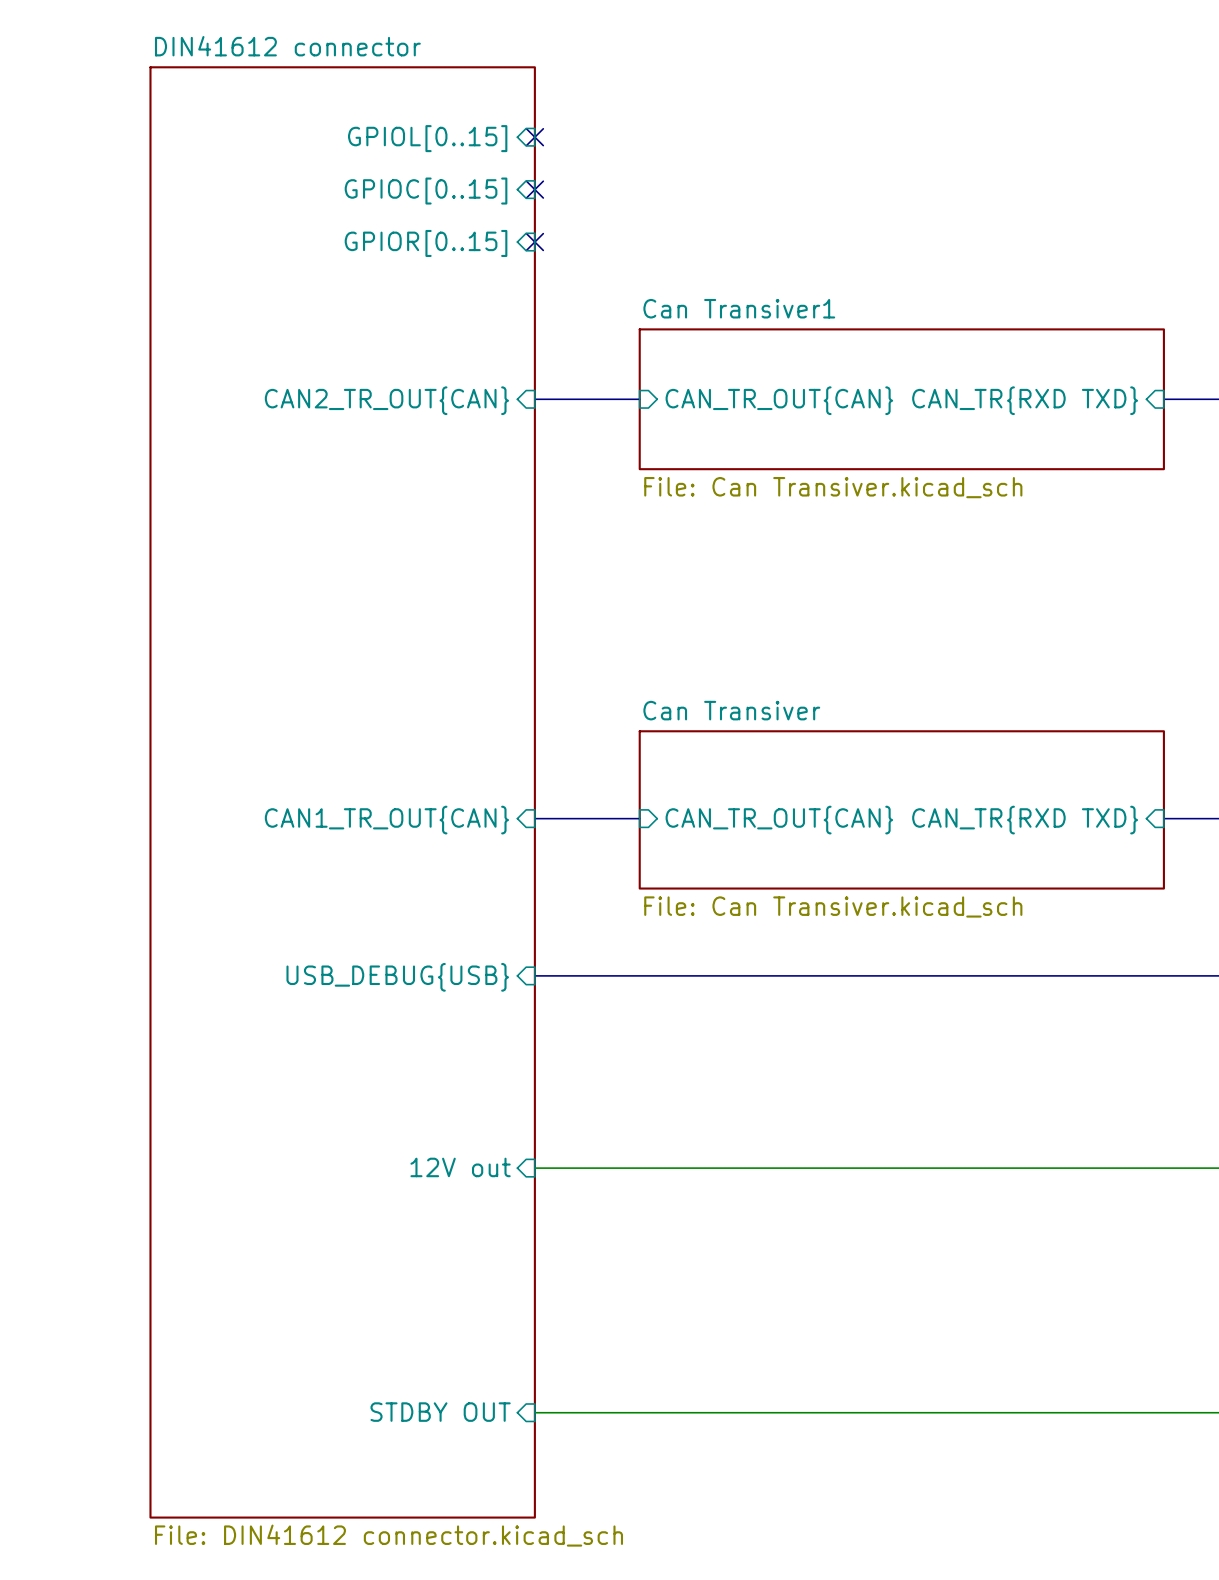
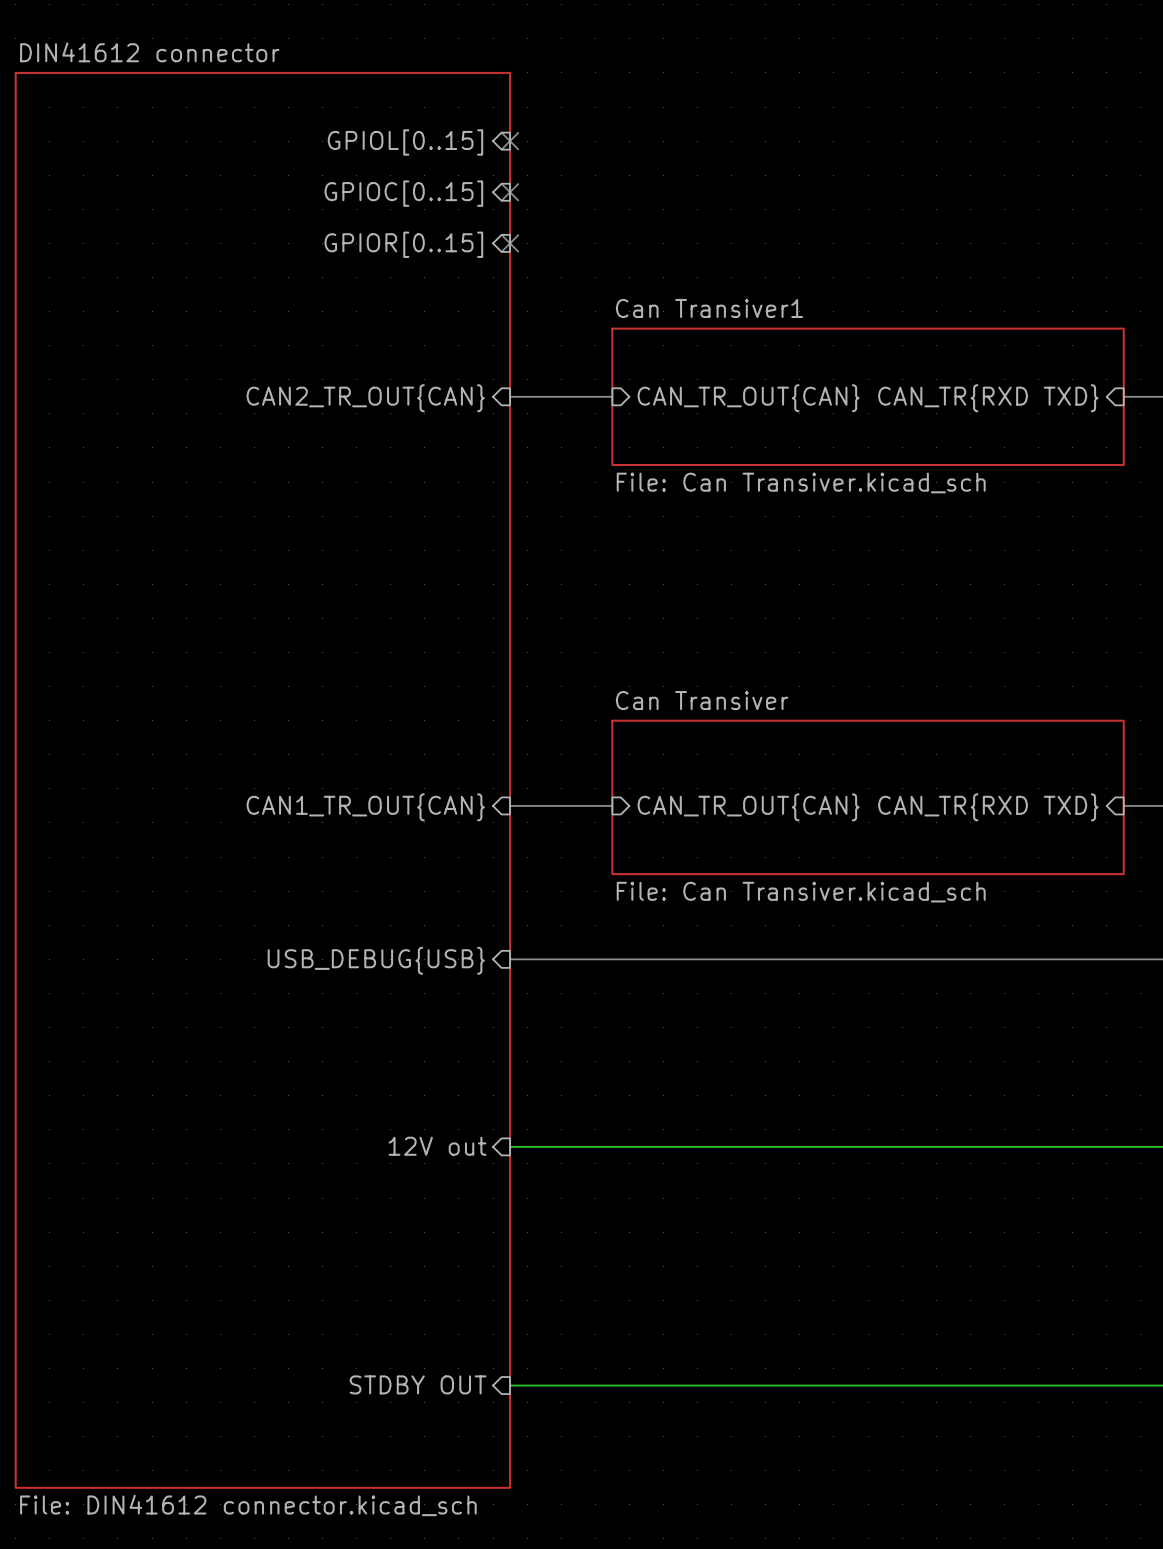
sheet DIN41612 connector name position: DIN41612 connector (287, 46) -> DIN41612 connector (149, 52)
sheet DIN41612 connector shape: [149, 66, 536, 1519] -> [14, 71, 512, 1489]
sheet DIN41612 connector value position: File: DIN41612 connector.kicad_sch (388, 1535) -> File: DIN41612 connector.kicad_sch (248, 1505)

